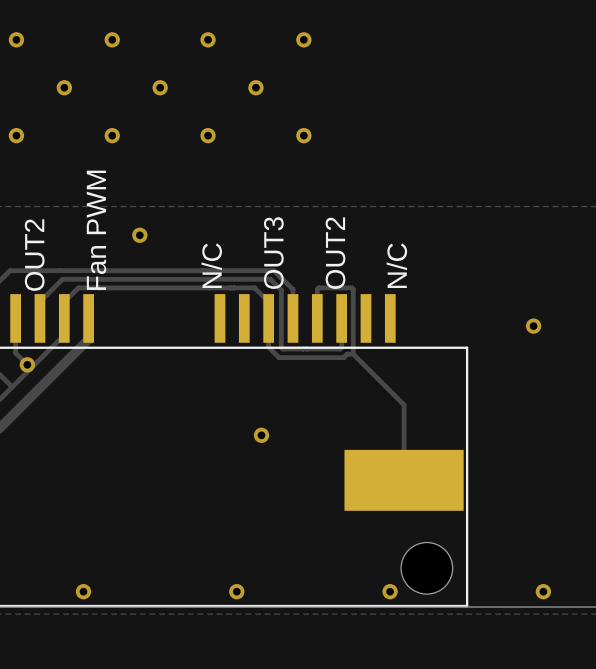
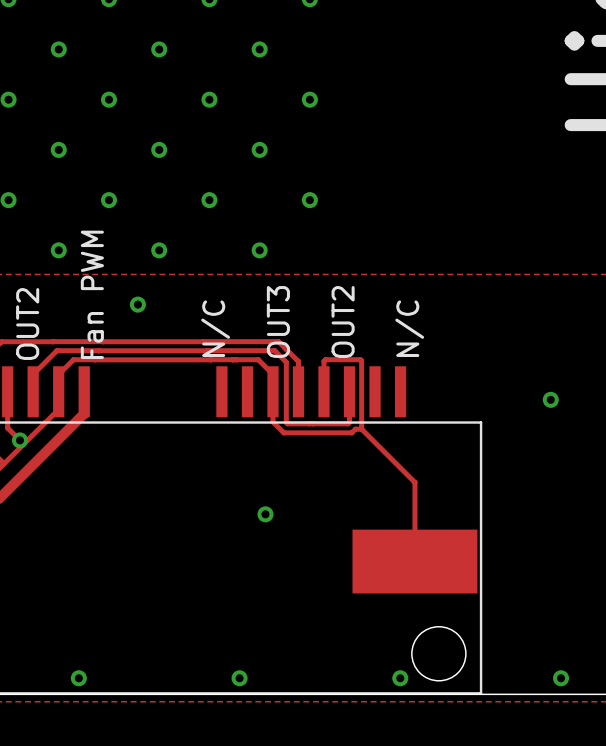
via: none -> (58, 250)
via: none -> (159, 250)
via: none -> (259, 250)

